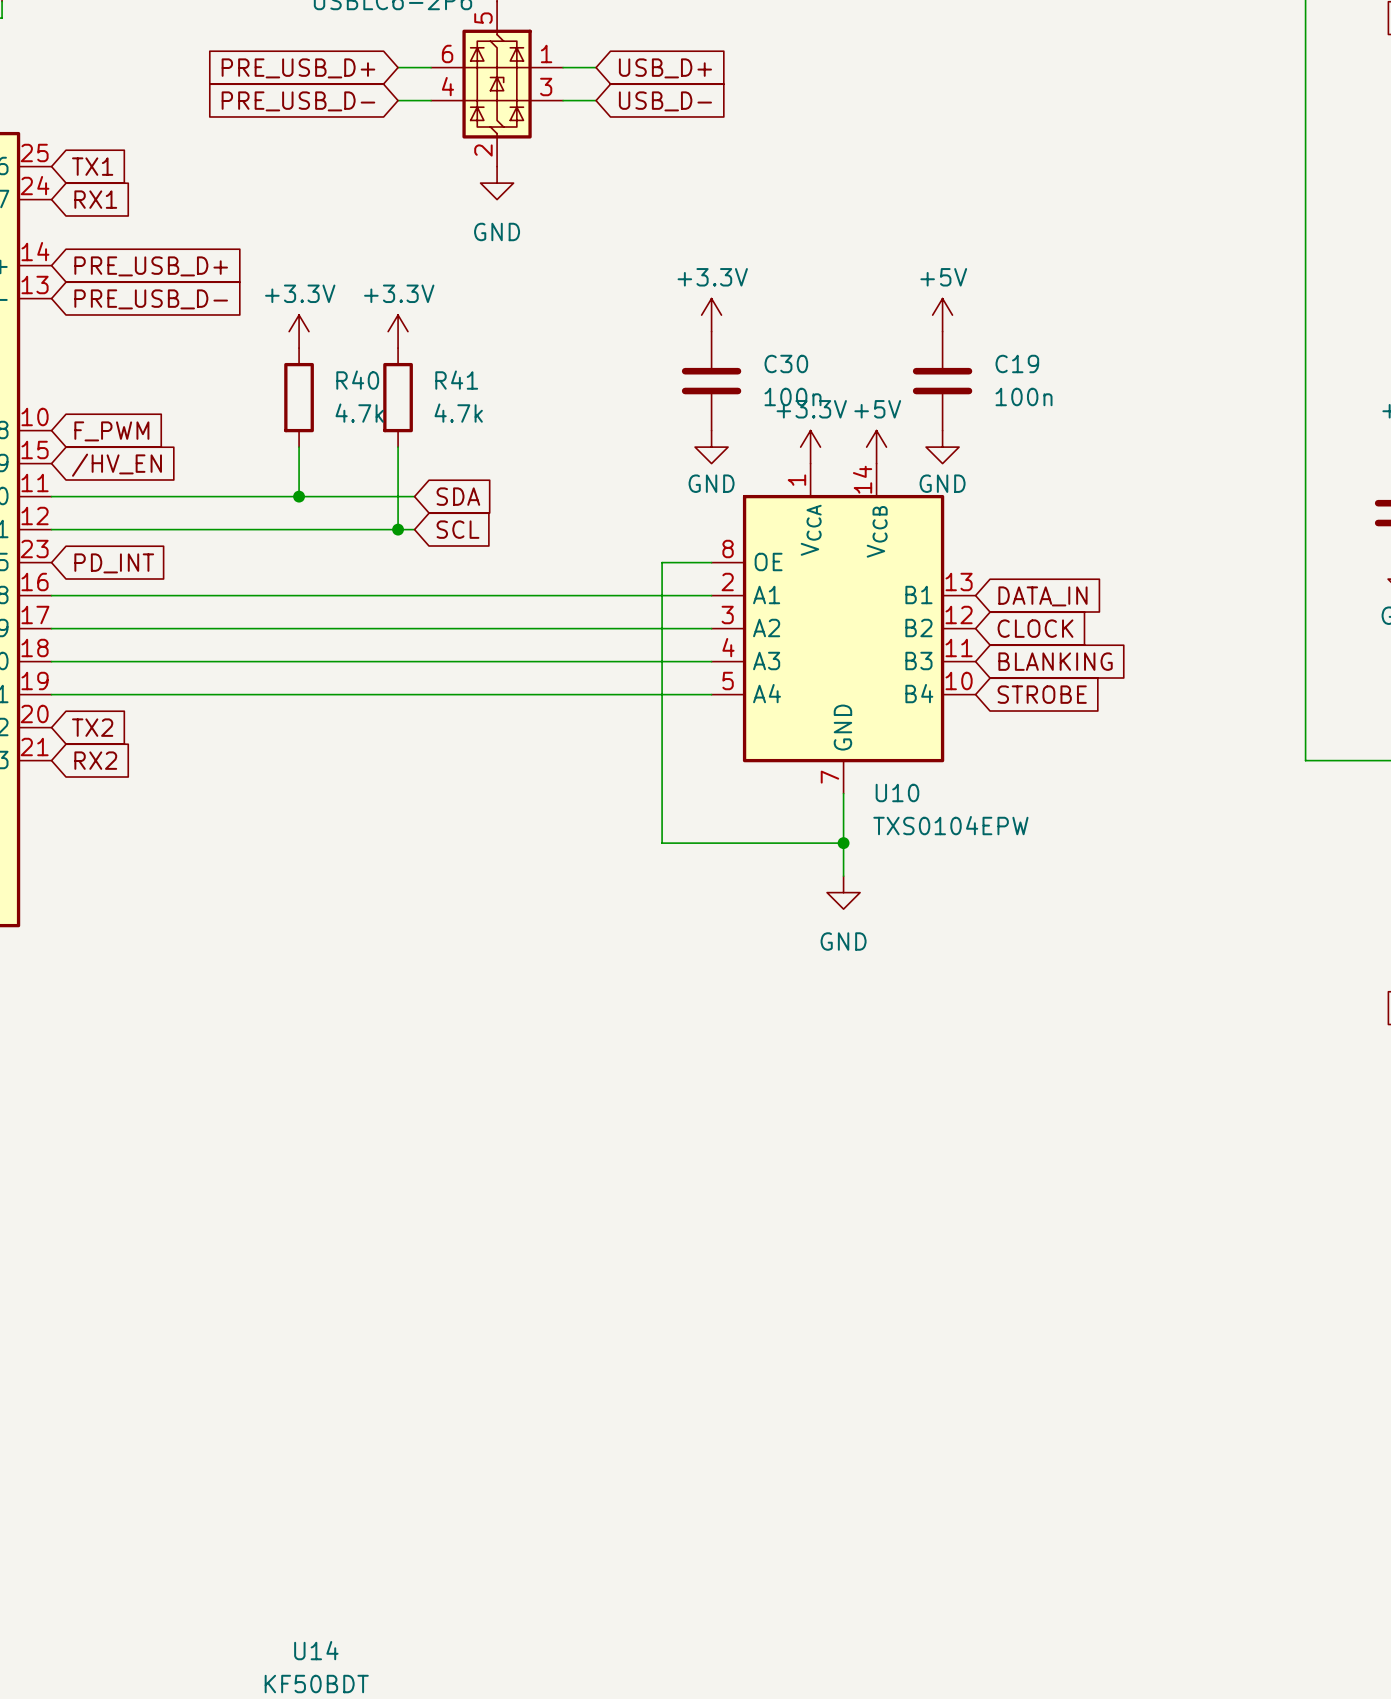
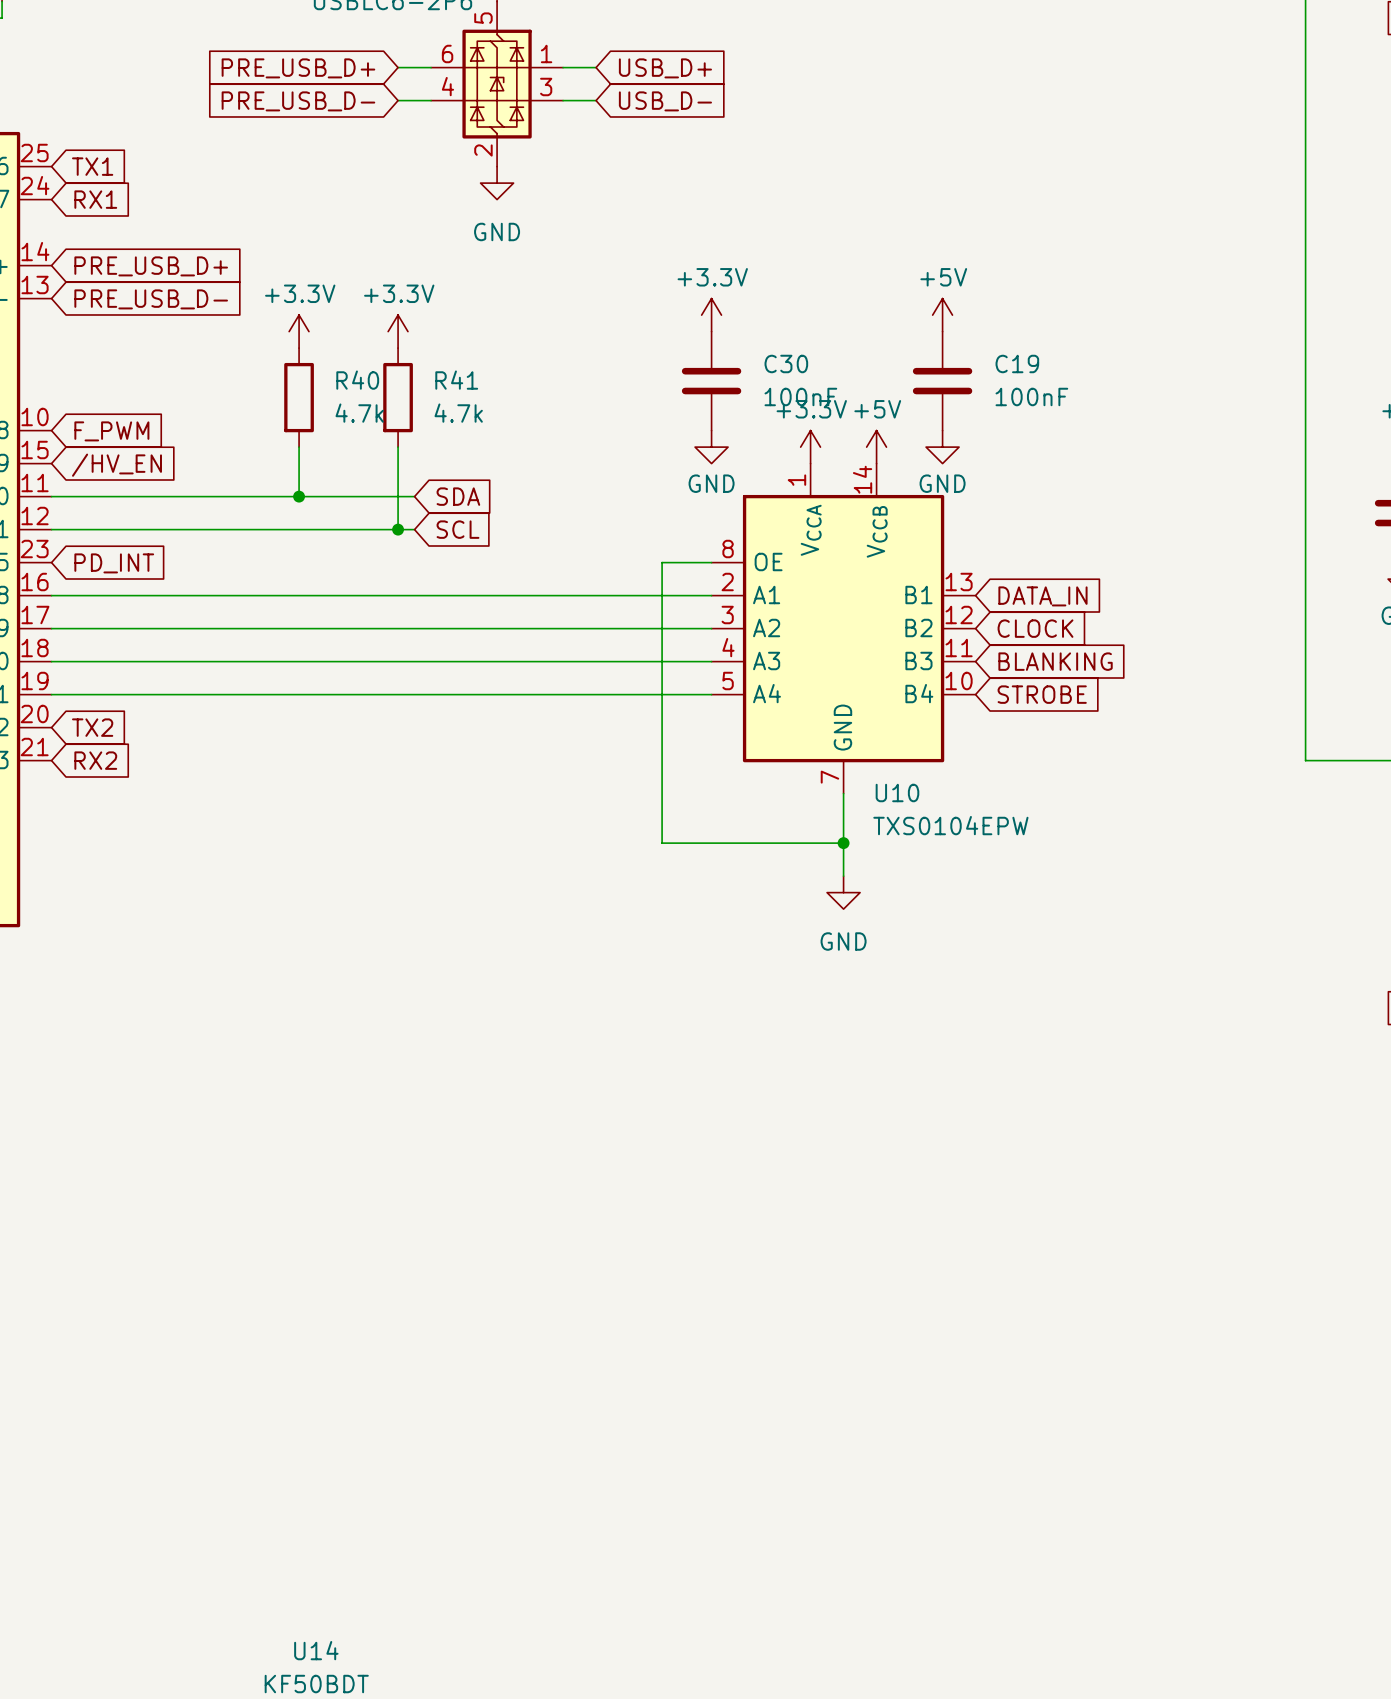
C30 value: 100n (793, 396) -> 100nF (800, 396)
C19 value: 100n (1024, 396) -> 100nF (1031, 396)

